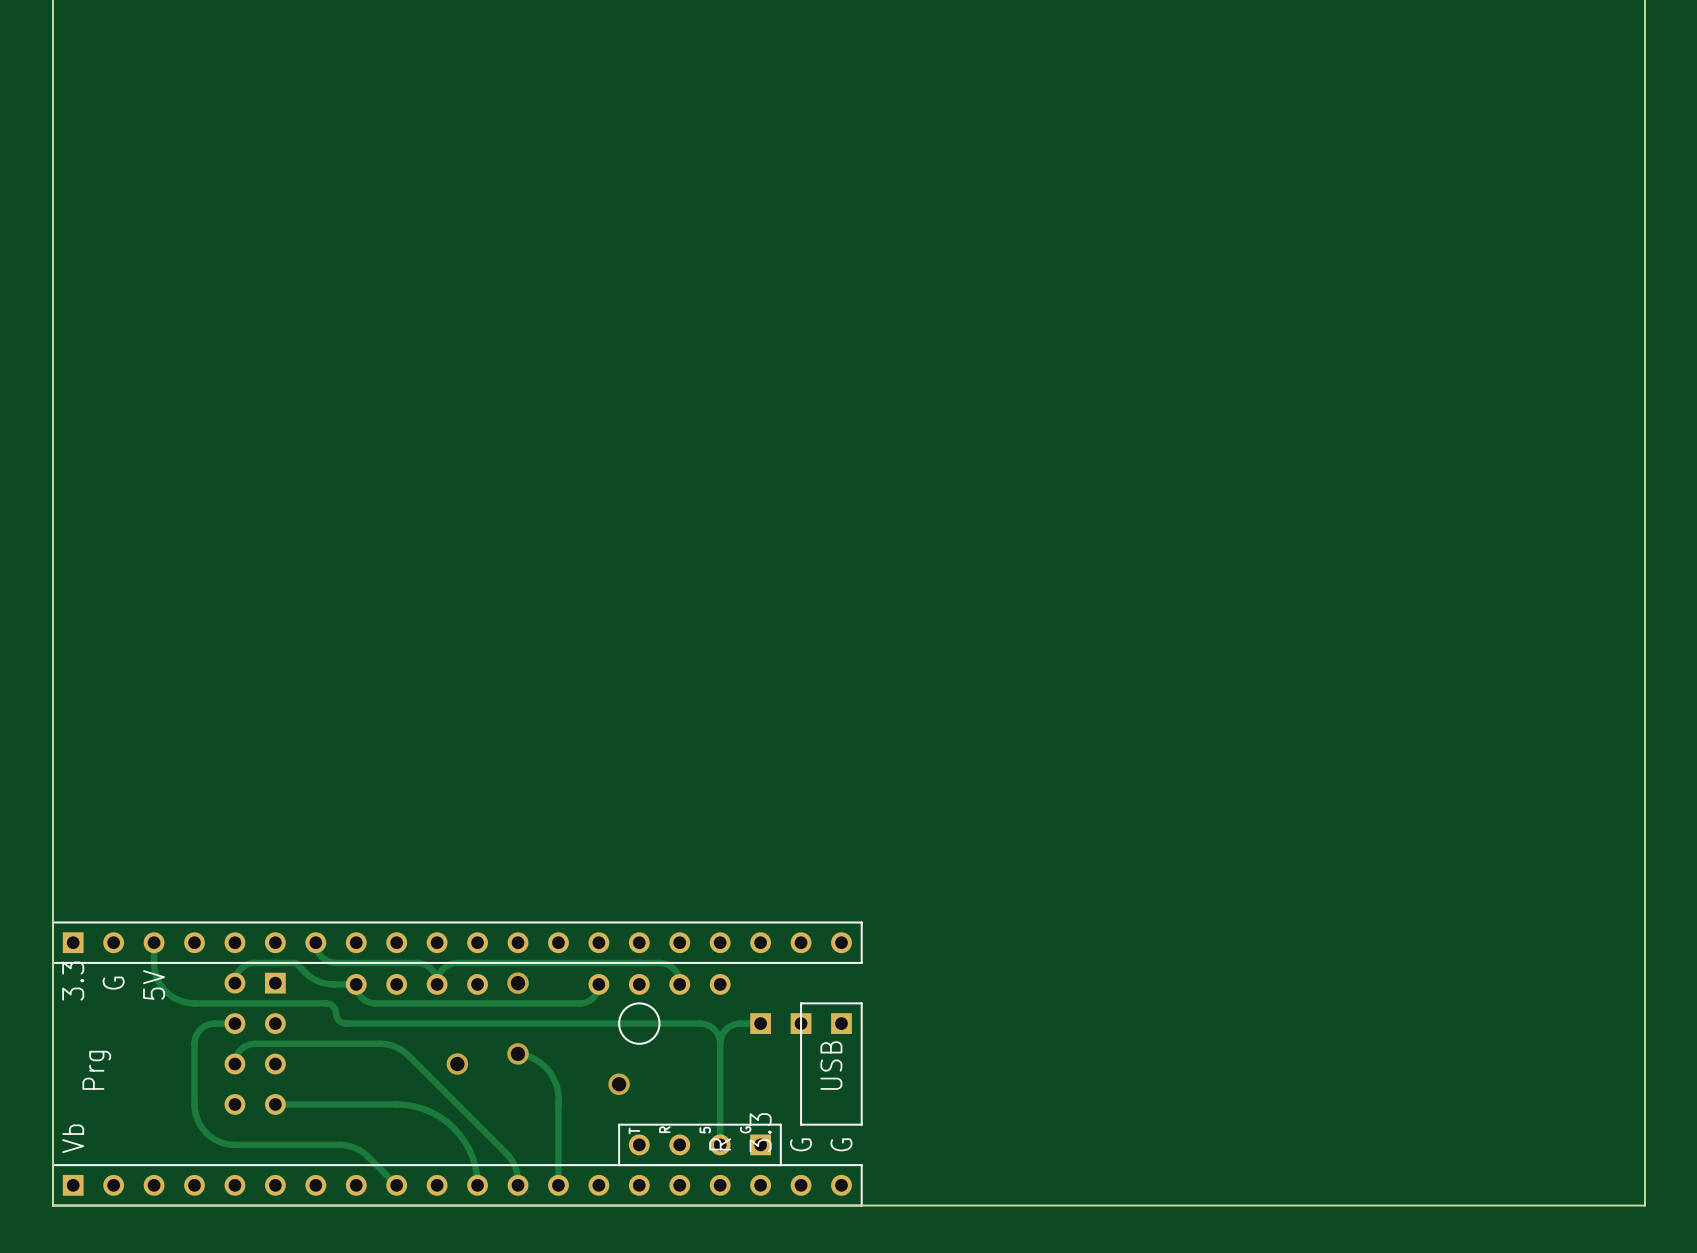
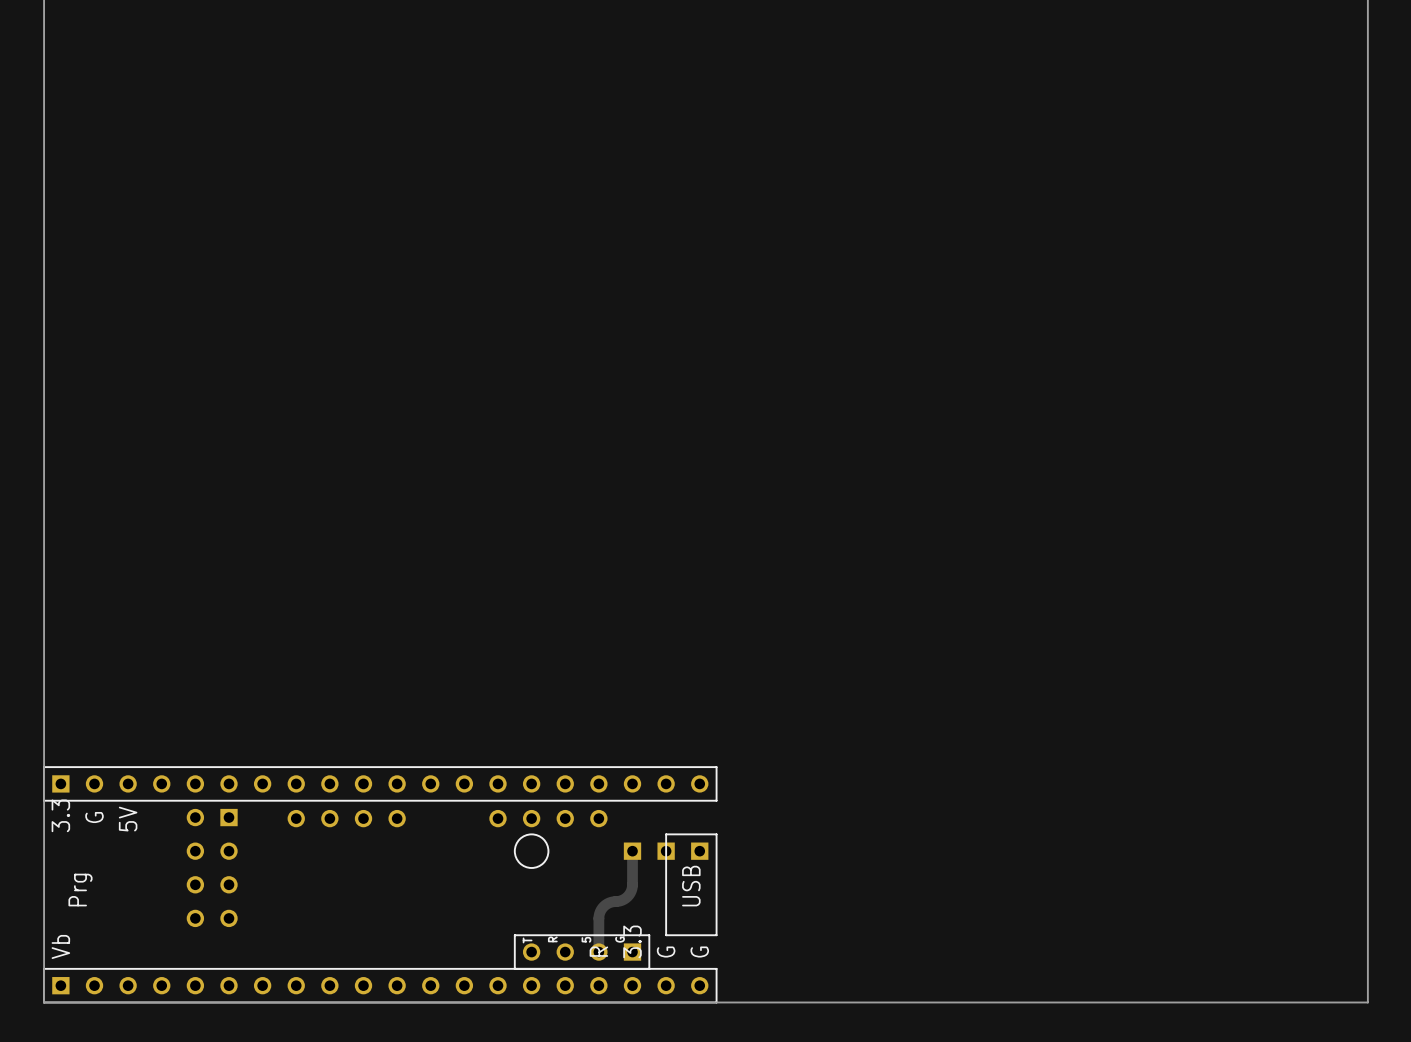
track: (154, 942) (154, 968) (159, 983) (169, 995) (189, 1003) (327, 1003) (333, 1007) (339, 1020) (346, 1023) (702, 1023) (710, 1026) (716, 1031) (720, 1043) -> none
track: (315, 942) (320, 955) (330, 962) (419, 963) (431, 968) (435, 975) (437, 983) -> none
track: (234, 983) (239, 970) (249, 963) (295, 962) (308, 975) (322, 982) (356, 984) (361, 997) (372, 1003) (582, 1003) (594, 995) (598, 984) -> none
track: (437, 983) (438, 975) (443, 968) (454, 963) (659, 962) (667, 964) (673, 968) (678, 975) (679, 984) -> none
via: (518, 983) -> none
track: (234, 1023) (206, 1025) (200, 1029) (195, 1038) (194, 1109) (197, 1119) (206, 1133) (214, 1139) (229, 1144) (339, 1144) (351, 1146) (365, 1154) (396, 1185) -> none
track: (760, 1023) (737, 1023) (730, 1026) (722, 1033) (720, 1043) -> none
track: (720, 1043) (720, 1104) -> (632, 851) (632, 884) (630, 893) (622, 900) (605, 905) (601, 910) (598, 918)
track: (518, 1053) (529, 1056) (544, 1066) (552, 1075) (556, 1086) (558, 1098) (558, 1185) -> none
via: (518, 1053) -> none
track: (234, 1064) (236, 1056) (240, 1049) (252, 1043) (379, 1043) (395, 1046) (408, 1055) (508, 1156) (516, 1170) (518, 1185) -> none
via: (457, 1064) -> none
via: (619, 1084) -> none
track: (275, 1104) (396, 1104) (423, 1108) (447, 1122) (459, 1134) (473, 1158) (477, 1185) -> none
track width: thin (720, 1104) (720, 1144) -> thick (598, 918) (598, 952)

